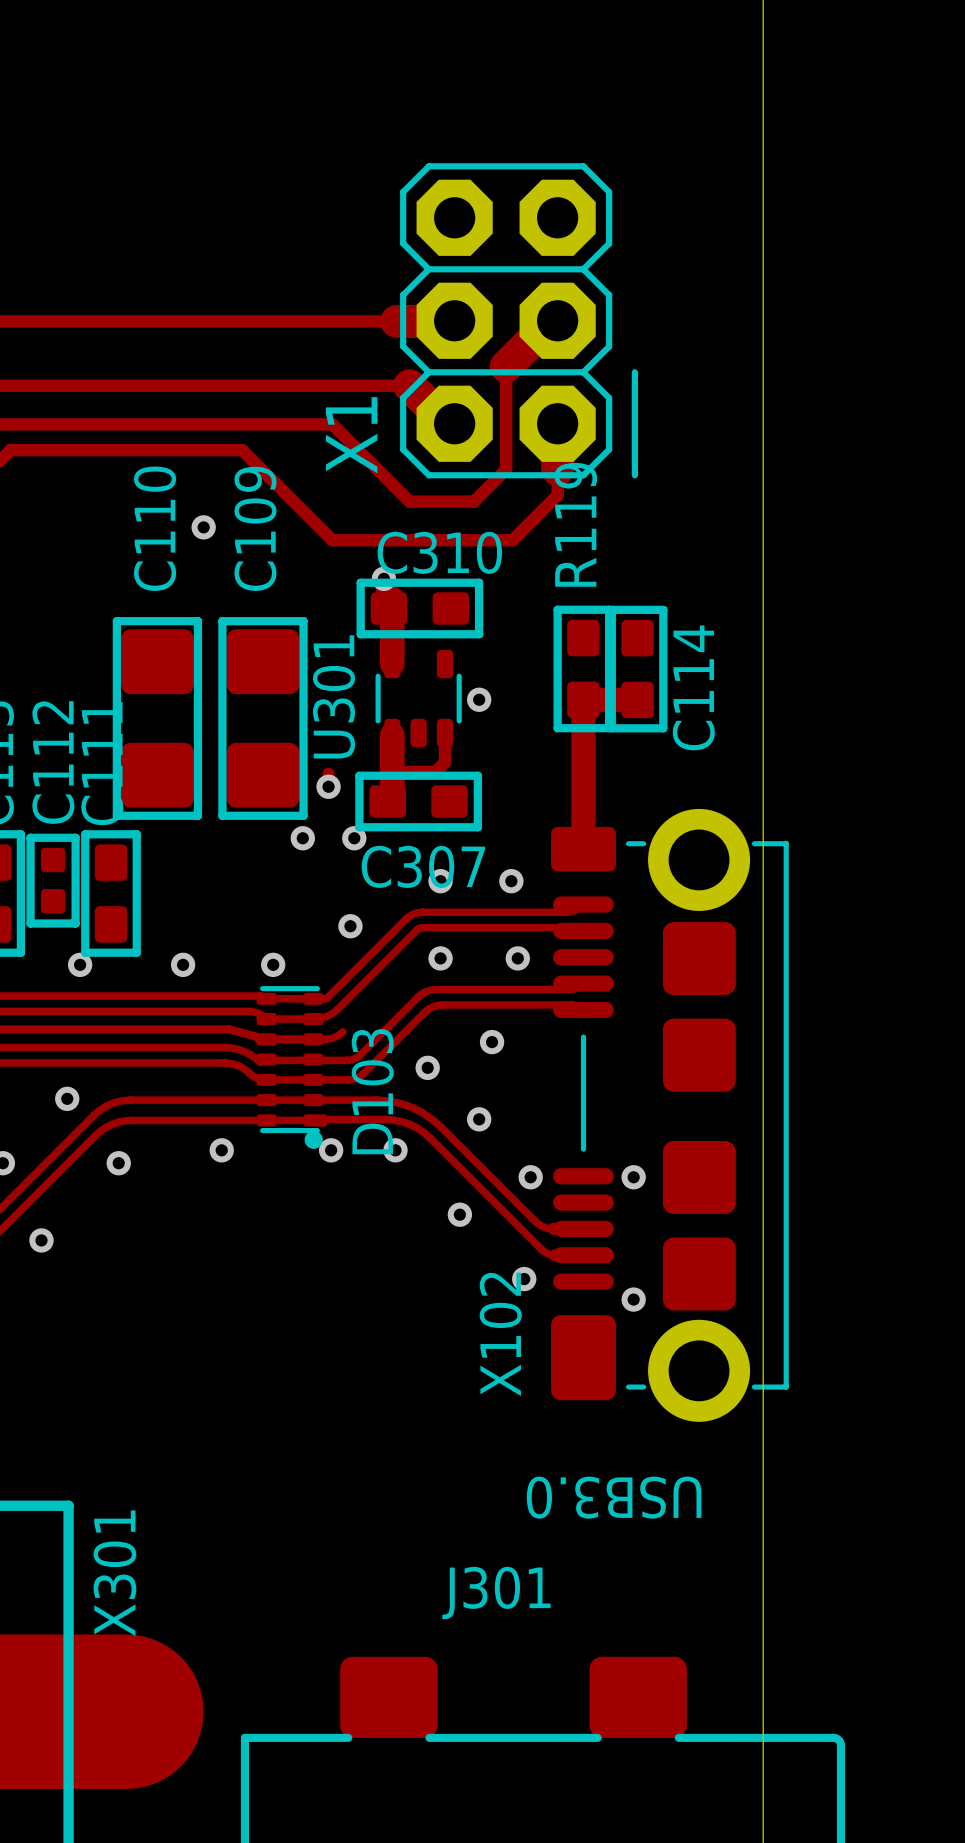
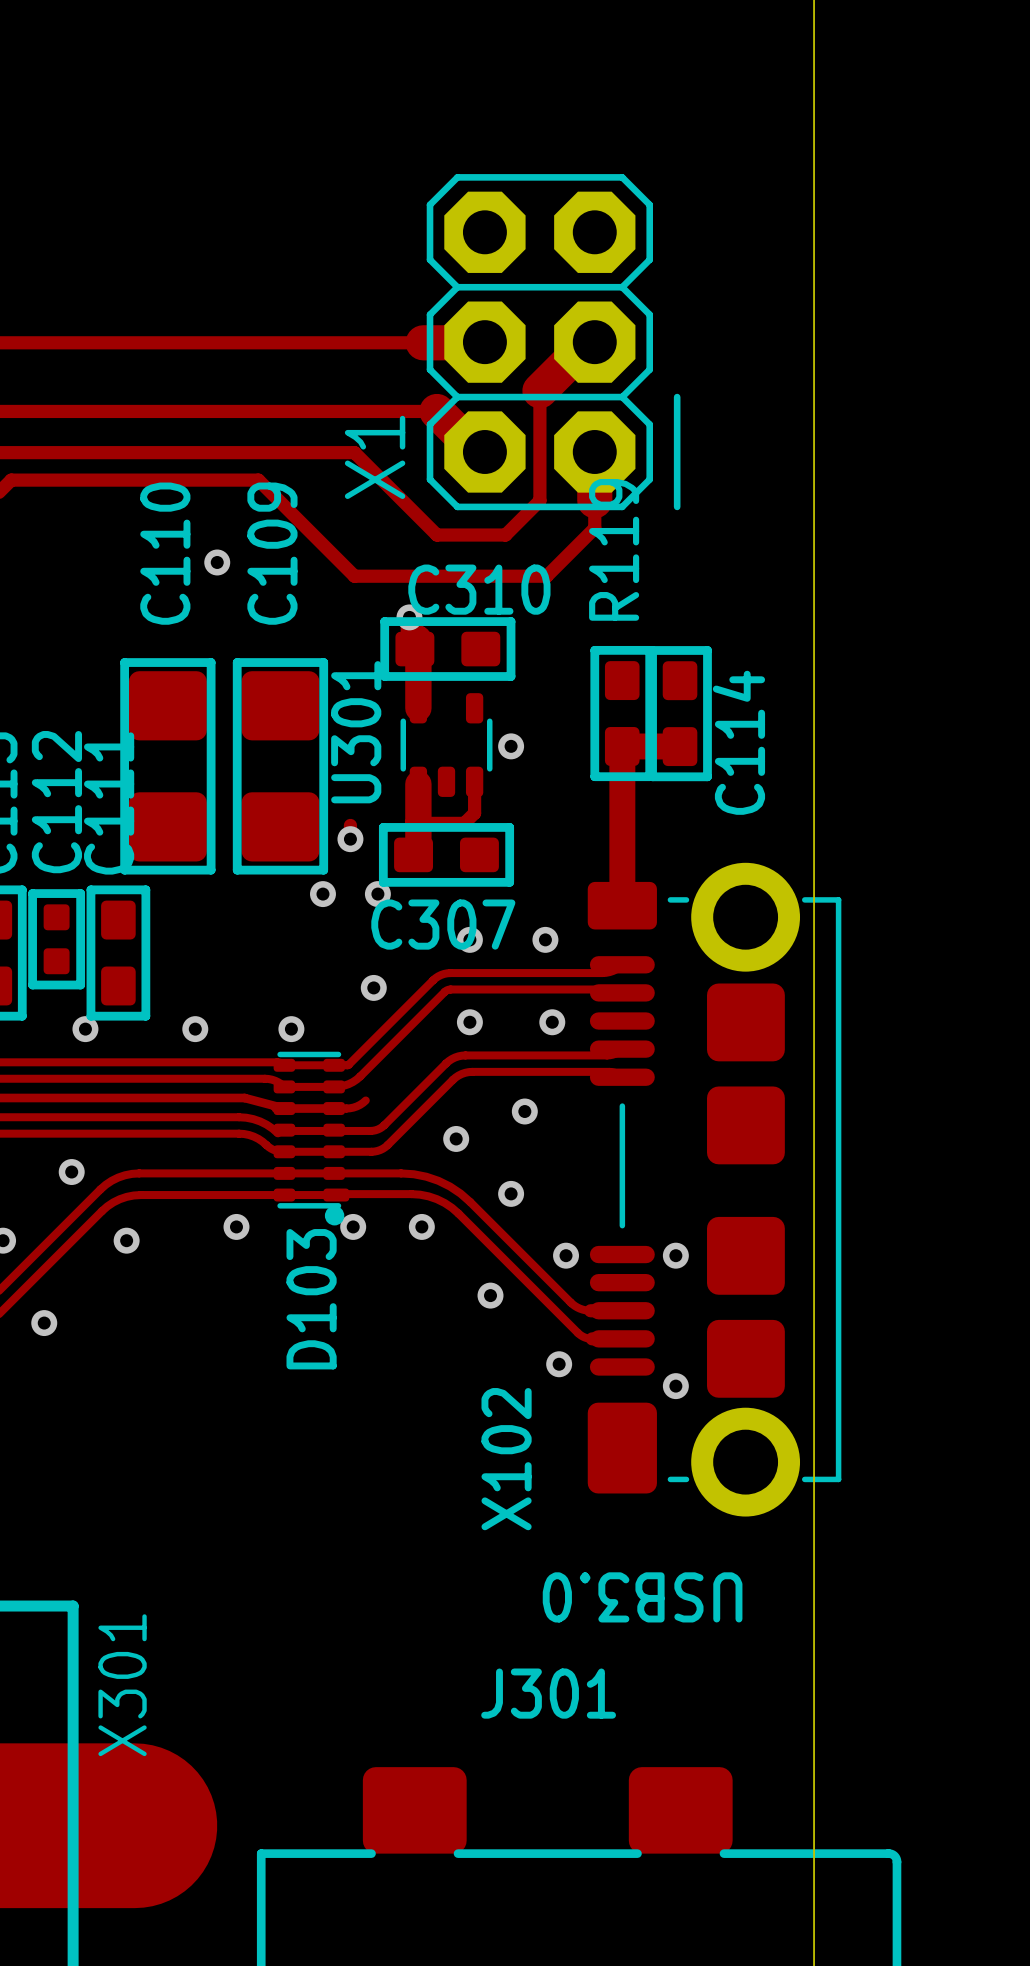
D103 name position: D103 (372, 1091) -> D103 (311, 1299)
X102 name position: X102 (500, 1334) -> X102 (506, 1459)

